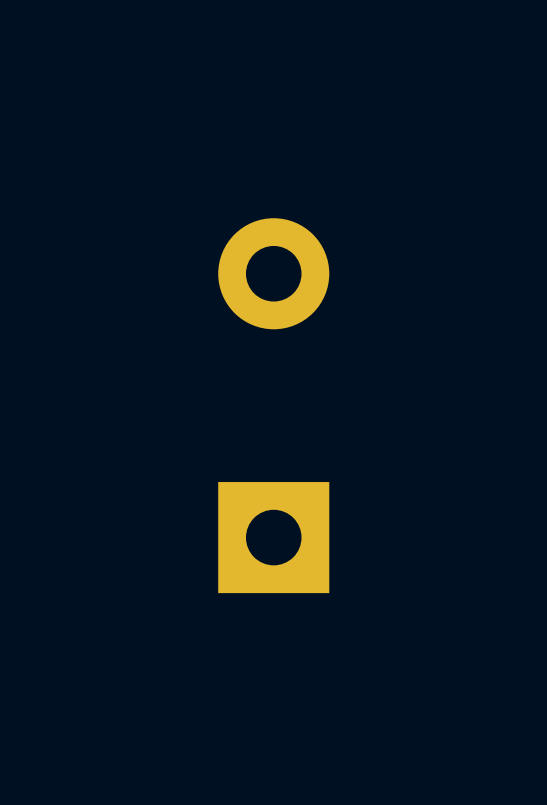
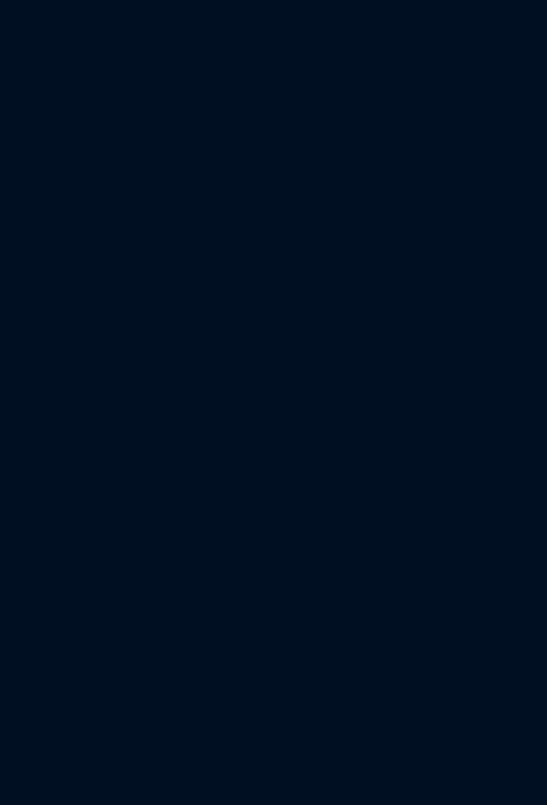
part: (273, 405) -> none

